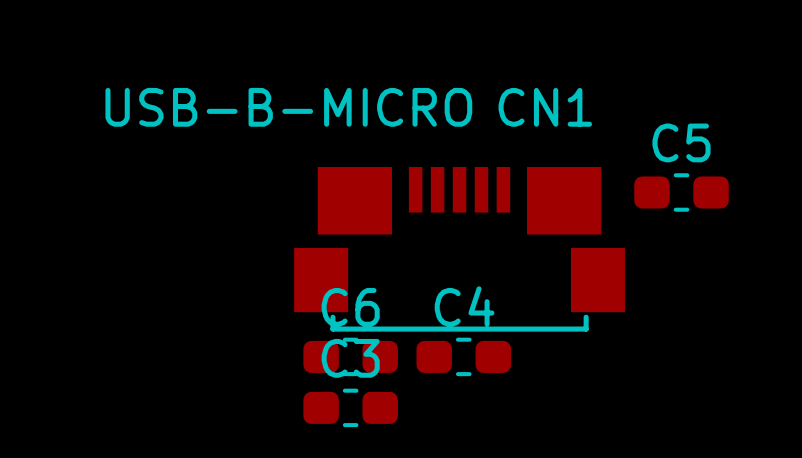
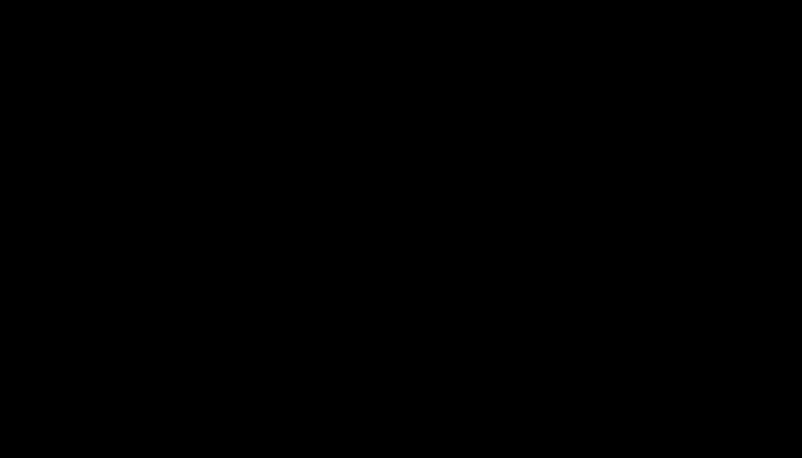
C5: (681, 192) -> none
CN1: USB-B-MICRO (459, 249) -> none
C6: (350, 356) -> none
C4: (463, 356) -> none
C3: (350, 407) -> none

